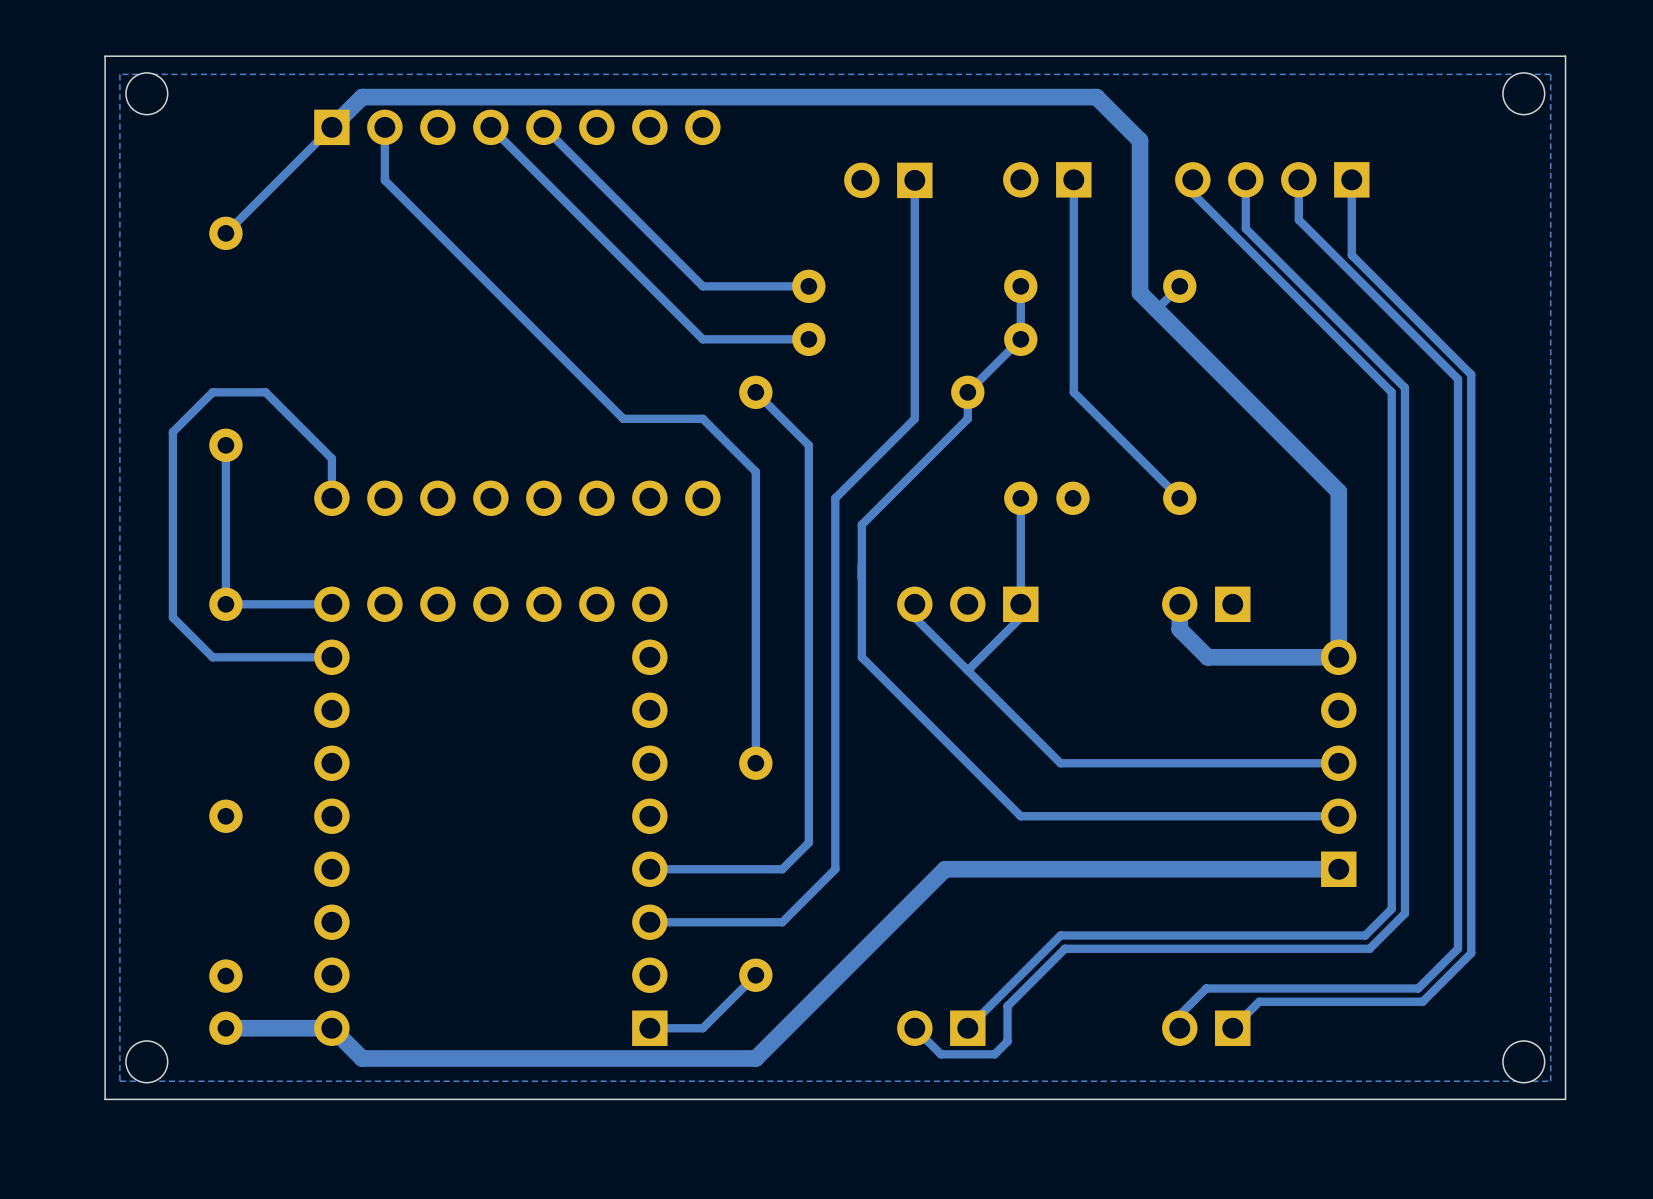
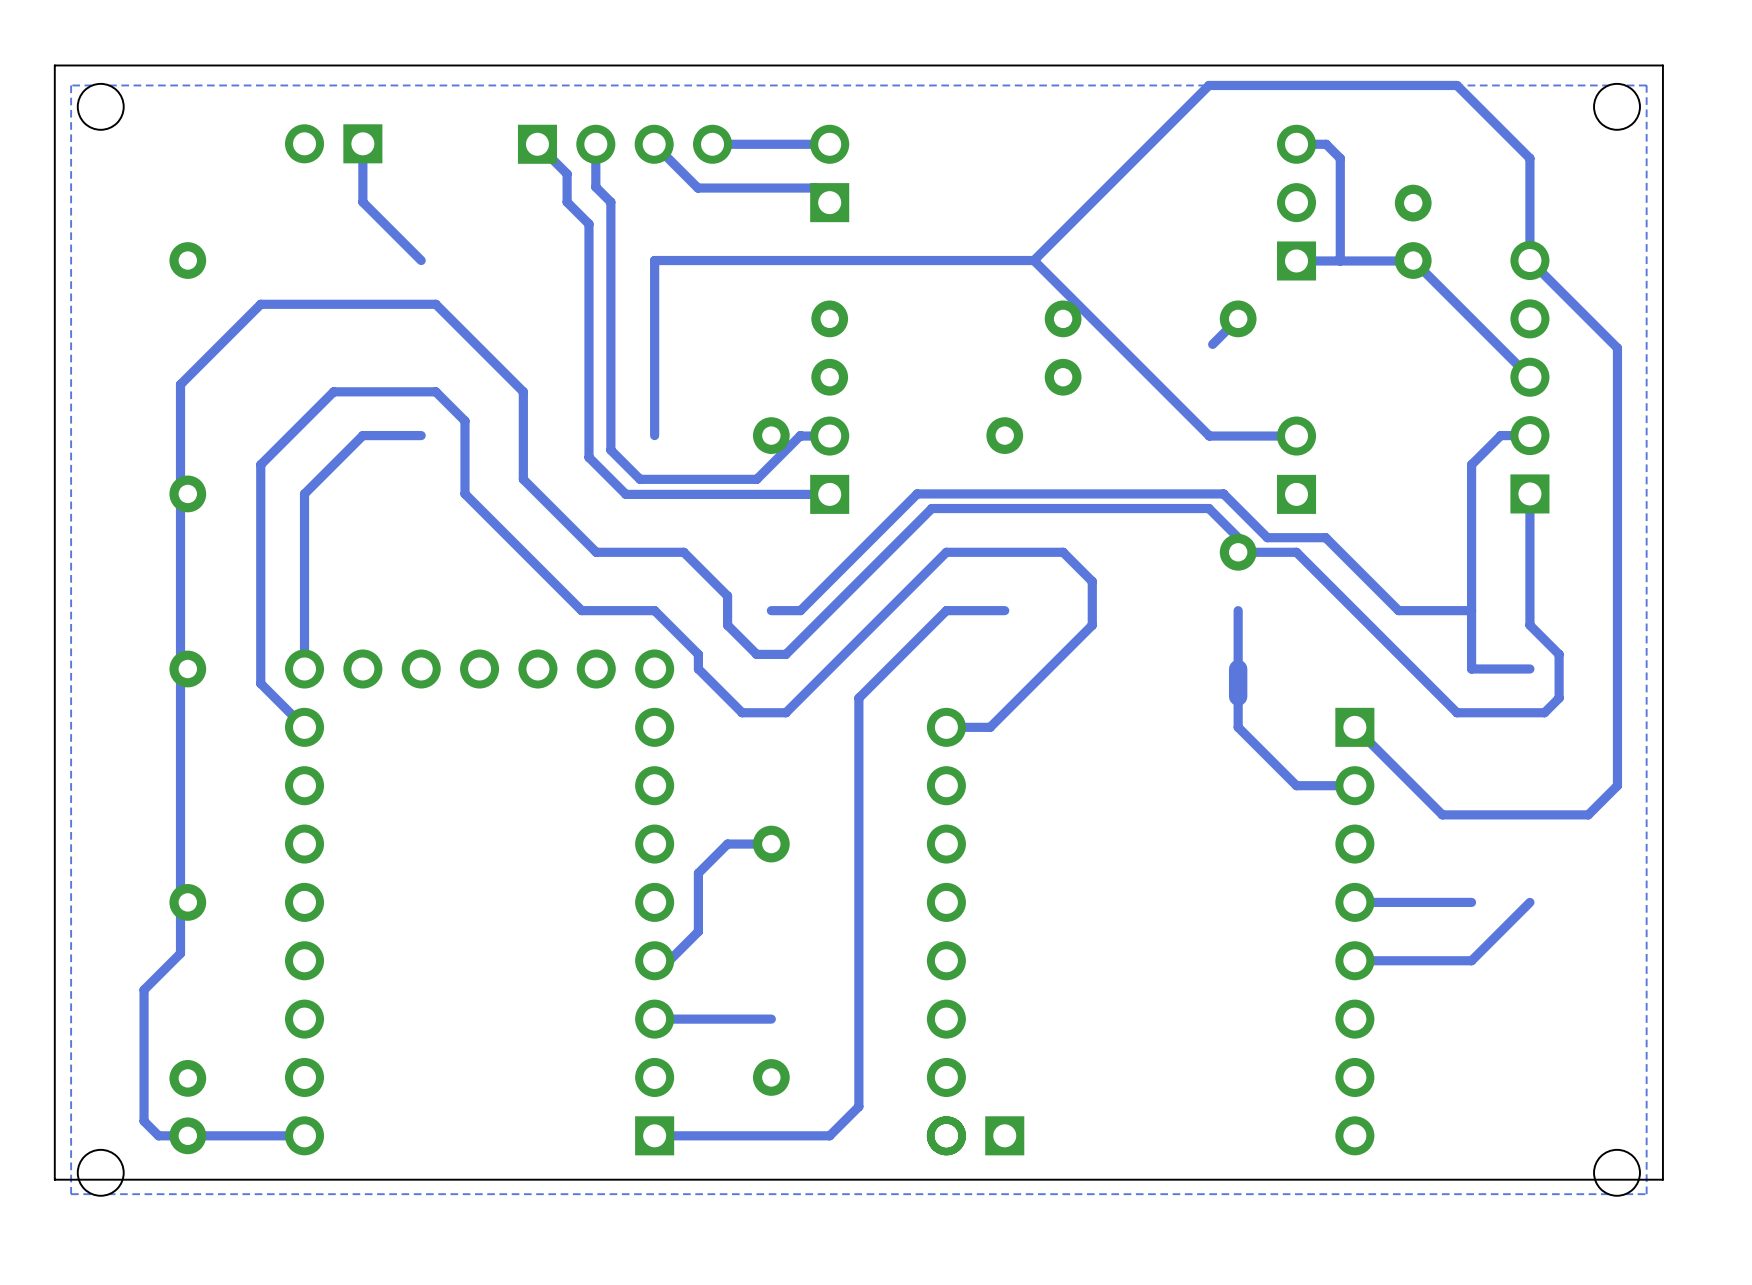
part: none -> (333, 143)
bottom track: (490, 127) (702, 339) (808, 339) -> none
part: (517, 127) -> none
bottom track: (543, 127) (702, 286) (808, 286) -> (538, 144) (567, 173) (567, 202) (588, 224) (588, 457) (625, 494) (829, 494)
part: none -> (625, 144)
bottom track: none -> (654, 144) (697, 188) (815, 188)
bottom track: none -> (829, 144) (712, 144)
bottom track: none -> (1296, 144) (1326, 144) (1340, 158) (1340, 260)
part: (1047, 179) -> none
bottom track: (1073, 179) (1073, 392) (1179, 498) -> none
bottom track: (1192, 179) (1192, 193) (1391, 392) (1391, 418) -> (1529, 435) (1500, 435) (1471, 464)
bottom track: (1245, 179) (1245, 228) (1404, 387) (1404, 913) (1369, 948) (1064, 948) (1007, 1006) (1007, 1041) (994, 1054) (940, 1054) (914, 1028) -> none
part: (1272, 179) -> none
bottom track: (1298, 179) (1298, 219) (1457, 379) (1457, 948) (1418, 988) (1206, 988) (1179, 1014) (1179, 1028) -> none
bottom track: (1351, 179) (1351, 255) (1471, 374) (1471, 591) -> (1529, 493) (1529, 625) (1559, 654)
part rotation: 0° (888, 180) -> 90° clockwise (829, 173)
part position: (888, 180) -> (829, 173)
bottom track: (914, 180) (914, 418) (888, 445) -> (1471, 610) (1398, 610) (1325, 537) (1267, 537) (1223, 493) (917, 493)
bottom track: (225, 233) (362, 97) (1096, 97) (1140, 140) (1140, 292) (1338, 491) (1338, 657) (1207, 657) (1179, 629) -> (1354, 785) (1296, 785) (1238, 727) (1238, 696)
bottom track: (437, 233) (610, 405) -> (595, 144) (595, 187) (610, 202) (610, 450)
bottom track: none -> (1033, 260) (1208, 85) (1456, 85) (1529, 158) (1529, 260) (1617, 348) (1617, 785) (1588, 814) (1442, 814) (1354, 727)
bottom track: none -> (1033, 260) (654, 260) (654, 435)
bottom track: none -> (1033, 260) (1209, 436) (1296, 436)
bottom track: none -> (1296, 260) (1413, 260) (1529, 377)
bottom track: (1020, 286) (1020, 339) (967, 392) (967, 418) (861, 524) (861, 657) (1020, 816) (1285, 816) -> none
bottom track: (755, 392) (808, 445) (808, 842) (782, 869) (663, 869) -> (771, 844) (727, 844) (698, 873) (698, 931) (669, 960)
bottom track: (623, 418) (702, 418) (755, 471) (755, 763) -> (625, 464) (640, 479) (756, 479) (800, 435) (829, 436)
part: none -> (829, 465)
part: none -> (1296, 465)
bottom track: (225, 445) (225, 604) (331, 604) -> (304, 552) (304, 668)
bottom track: (331, 458) (265, 392) (212, 392) (172, 432) (172, 617) (212, 657) (331, 657) -> (304, 508) (304, 493) (362, 435) (421, 435)
part: (517, 498) -> none
bottom track: (835, 498) (835, 630) -> (858, 552) (800, 610) (771, 610)
bottom track: (1020, 498) (1020, 617) (967, 670) -> none
part rotation: 0° (1046, 498) -> 90° clockwise (1413, 231)
part position: (1046, 498) -> (1413, 231)
bottom track: none -> (1004, 610) (946, 610) (858, 698)
bottom track: none -> (1238, 610) (1238, 668)
bottom track: (914, 604) (914, 617) (1060, 763) (1338, 763) -> none
part rotation: 0° (967, 604) -> 90° clockwise (1296, 202)
part position: (967, 604) -> (1296, 202)
part: (1206, 604) -> none
bottom track: (1391, 604) (1391, 909) (1365, 935) (1060, 935) (967, 1028) -> (1471, 668) (1529, 668)
bottom track: (1471, 630) (1471, 953) (1422, 1001) (1259, 1001) (1232, 1028) -> (1559, 698) (1544, 712) (1456, 712) (1296, 552) (1252, 552) (1208, 508) (931, 508) (785, 654) (756, 654) (727, 625) (727, 596) (683, 552) (596, 552) (523, 479) (523, 391) (435, 304) (260, 304) (180, 384) (180, 953) (144, 989) (144, 1121) (158, 1135) (187, 1135)
bottom track: none -> (946, 727) (990, 727) (1092, 625) (1092, 581) (1063, 552) (946, 552) (785, 712) (742, 712) (698, 668) (698, 654) (654, 610) (581, 610) (464, 493) (464, 420) (435, 391) (333, 391) (260, 464) (260, 683) (304, 727)
part position: (1338, 763) -> (1529, 377)
bottom track: none -> (1471, 902) (1413, 902)
bottom track: none -> (1529, 902) (1471, 960) (1413, 960)
part: none -> (946, 931)
part: none -> (1354, 931)
bottom track: (835, 869) (782, 922) (755, 922) -> (858, 960) (858, 1106) (829, 1135) (712, 1135)
bottom track: (1285, 869) (945, 869) (755, 1058) (362, 1058) (331, 1028) -> none
bottom track width: thick (1338, 869) (1285, 869) -> thin (1413, 960) (1354, 960)
bottom track: (755, 975) (702, 1028) -> none
bottom track width: thick (331, 1028) (225, 1028) -> thin (304, 1135) (187, 1135)
part: (1206, 1028) -> none
board edge: (1565, 1068) (1565, 1099) (105, 1099) (105, 1068) -> (1662, 1179) (54, 1179)

